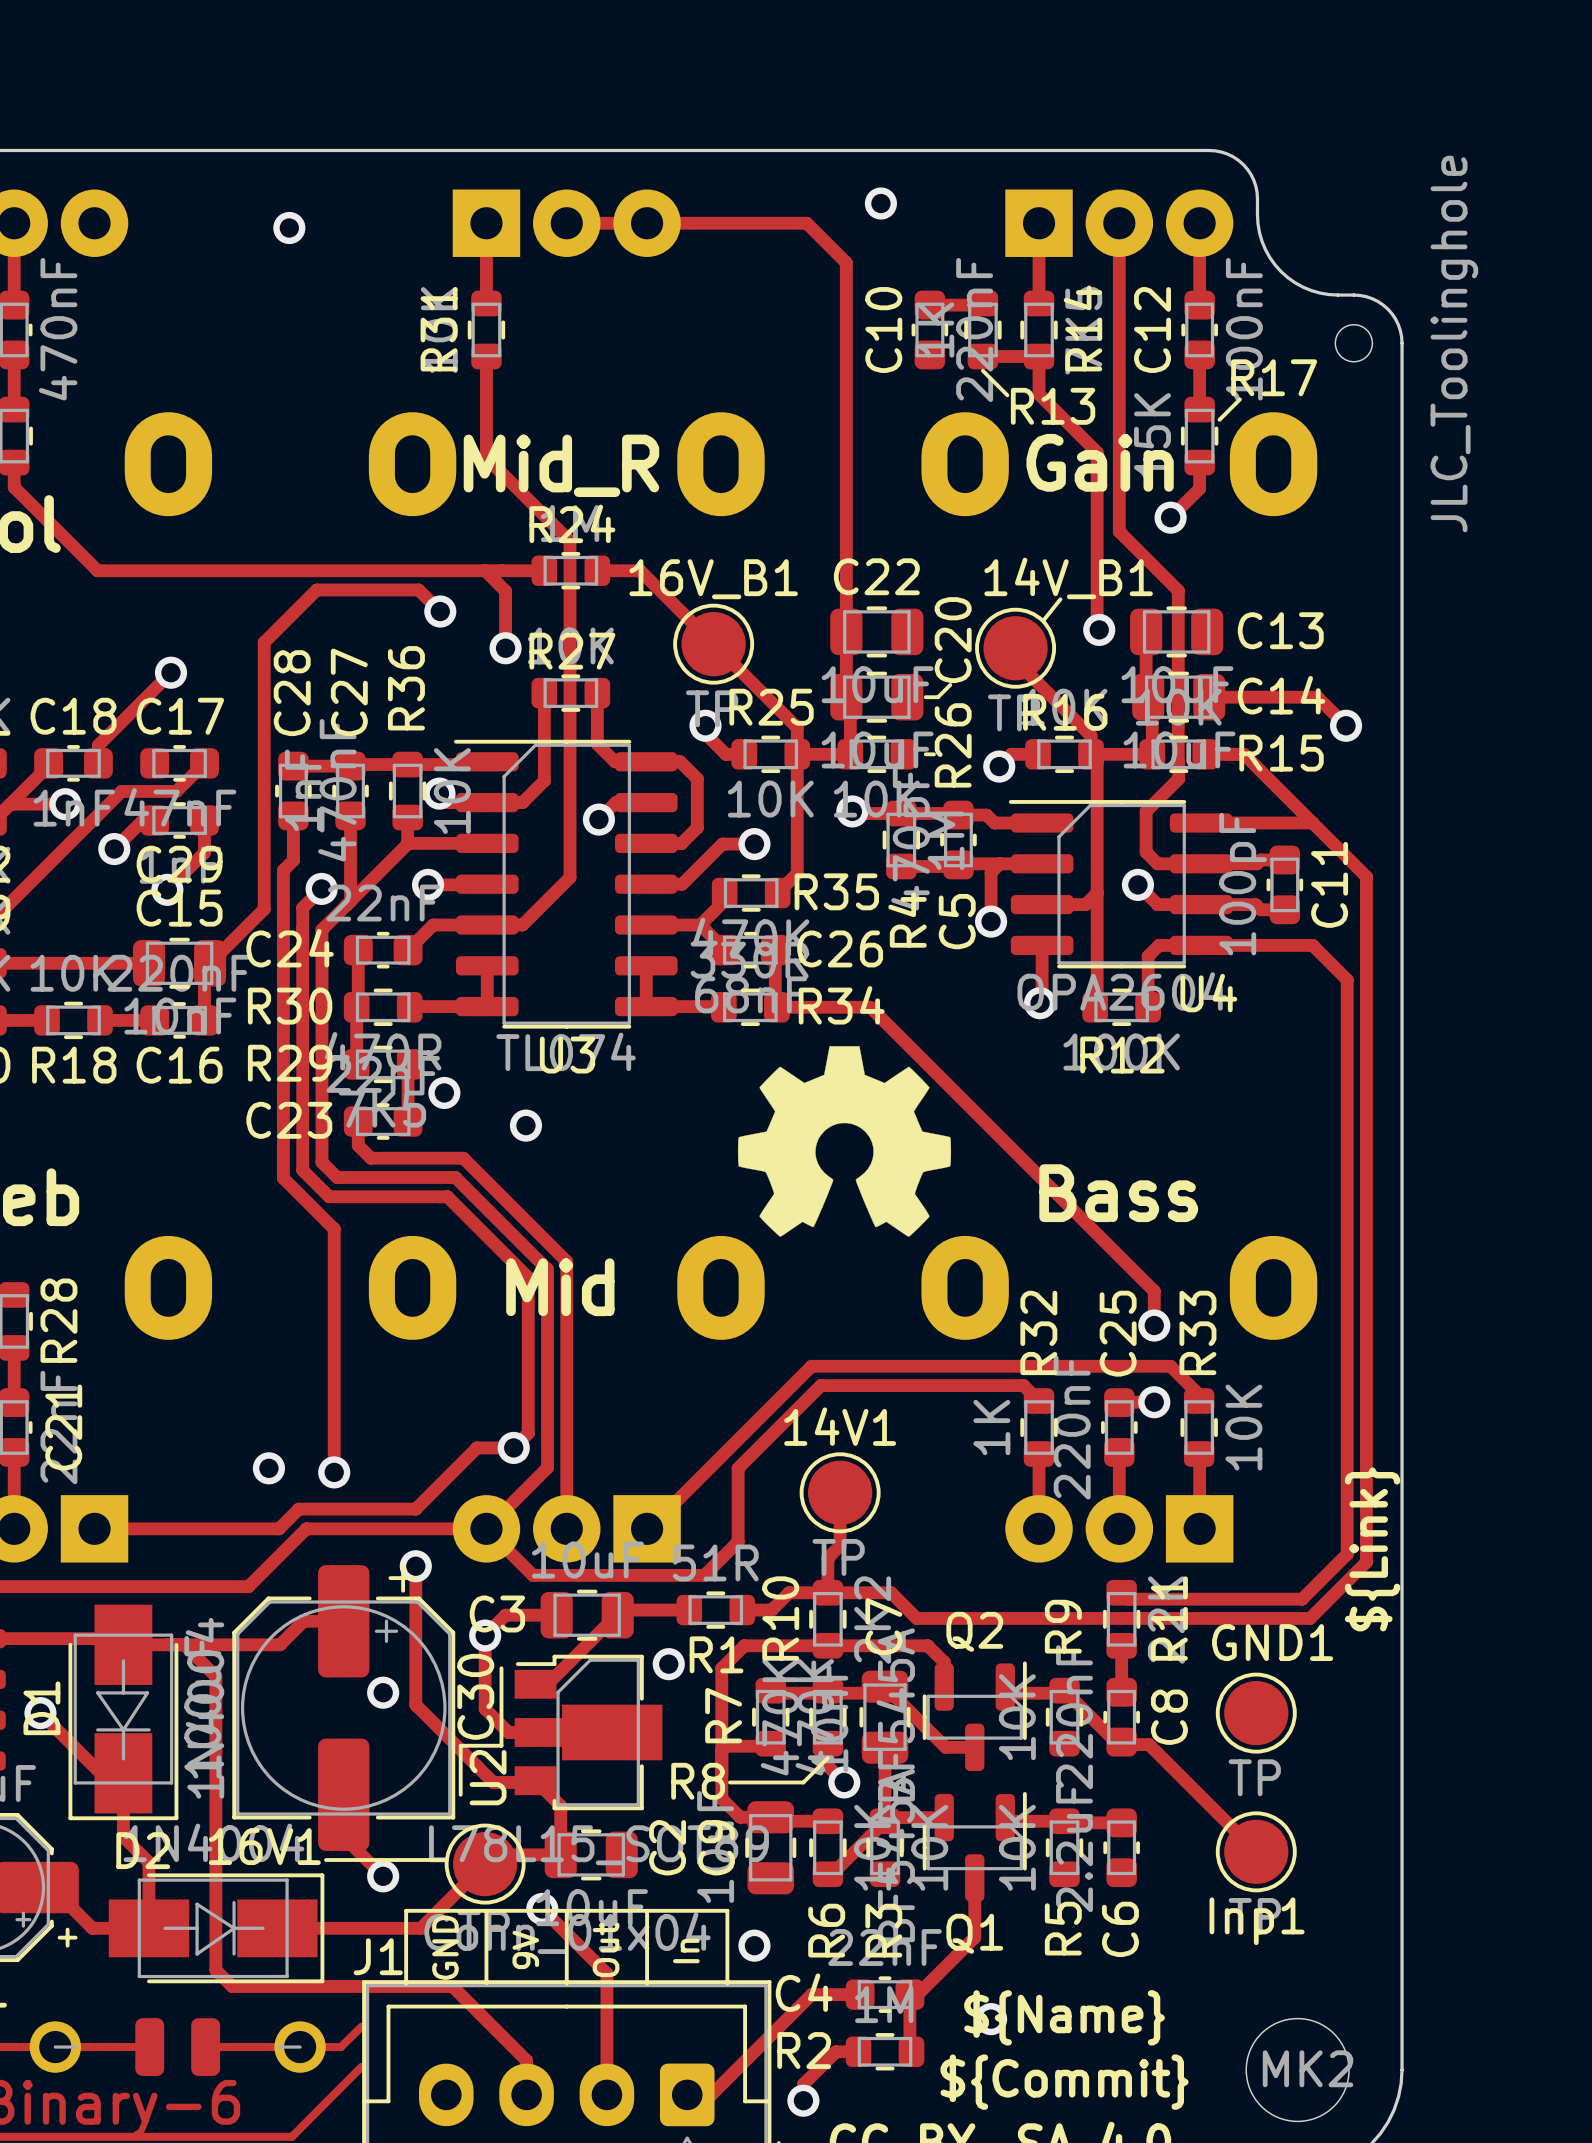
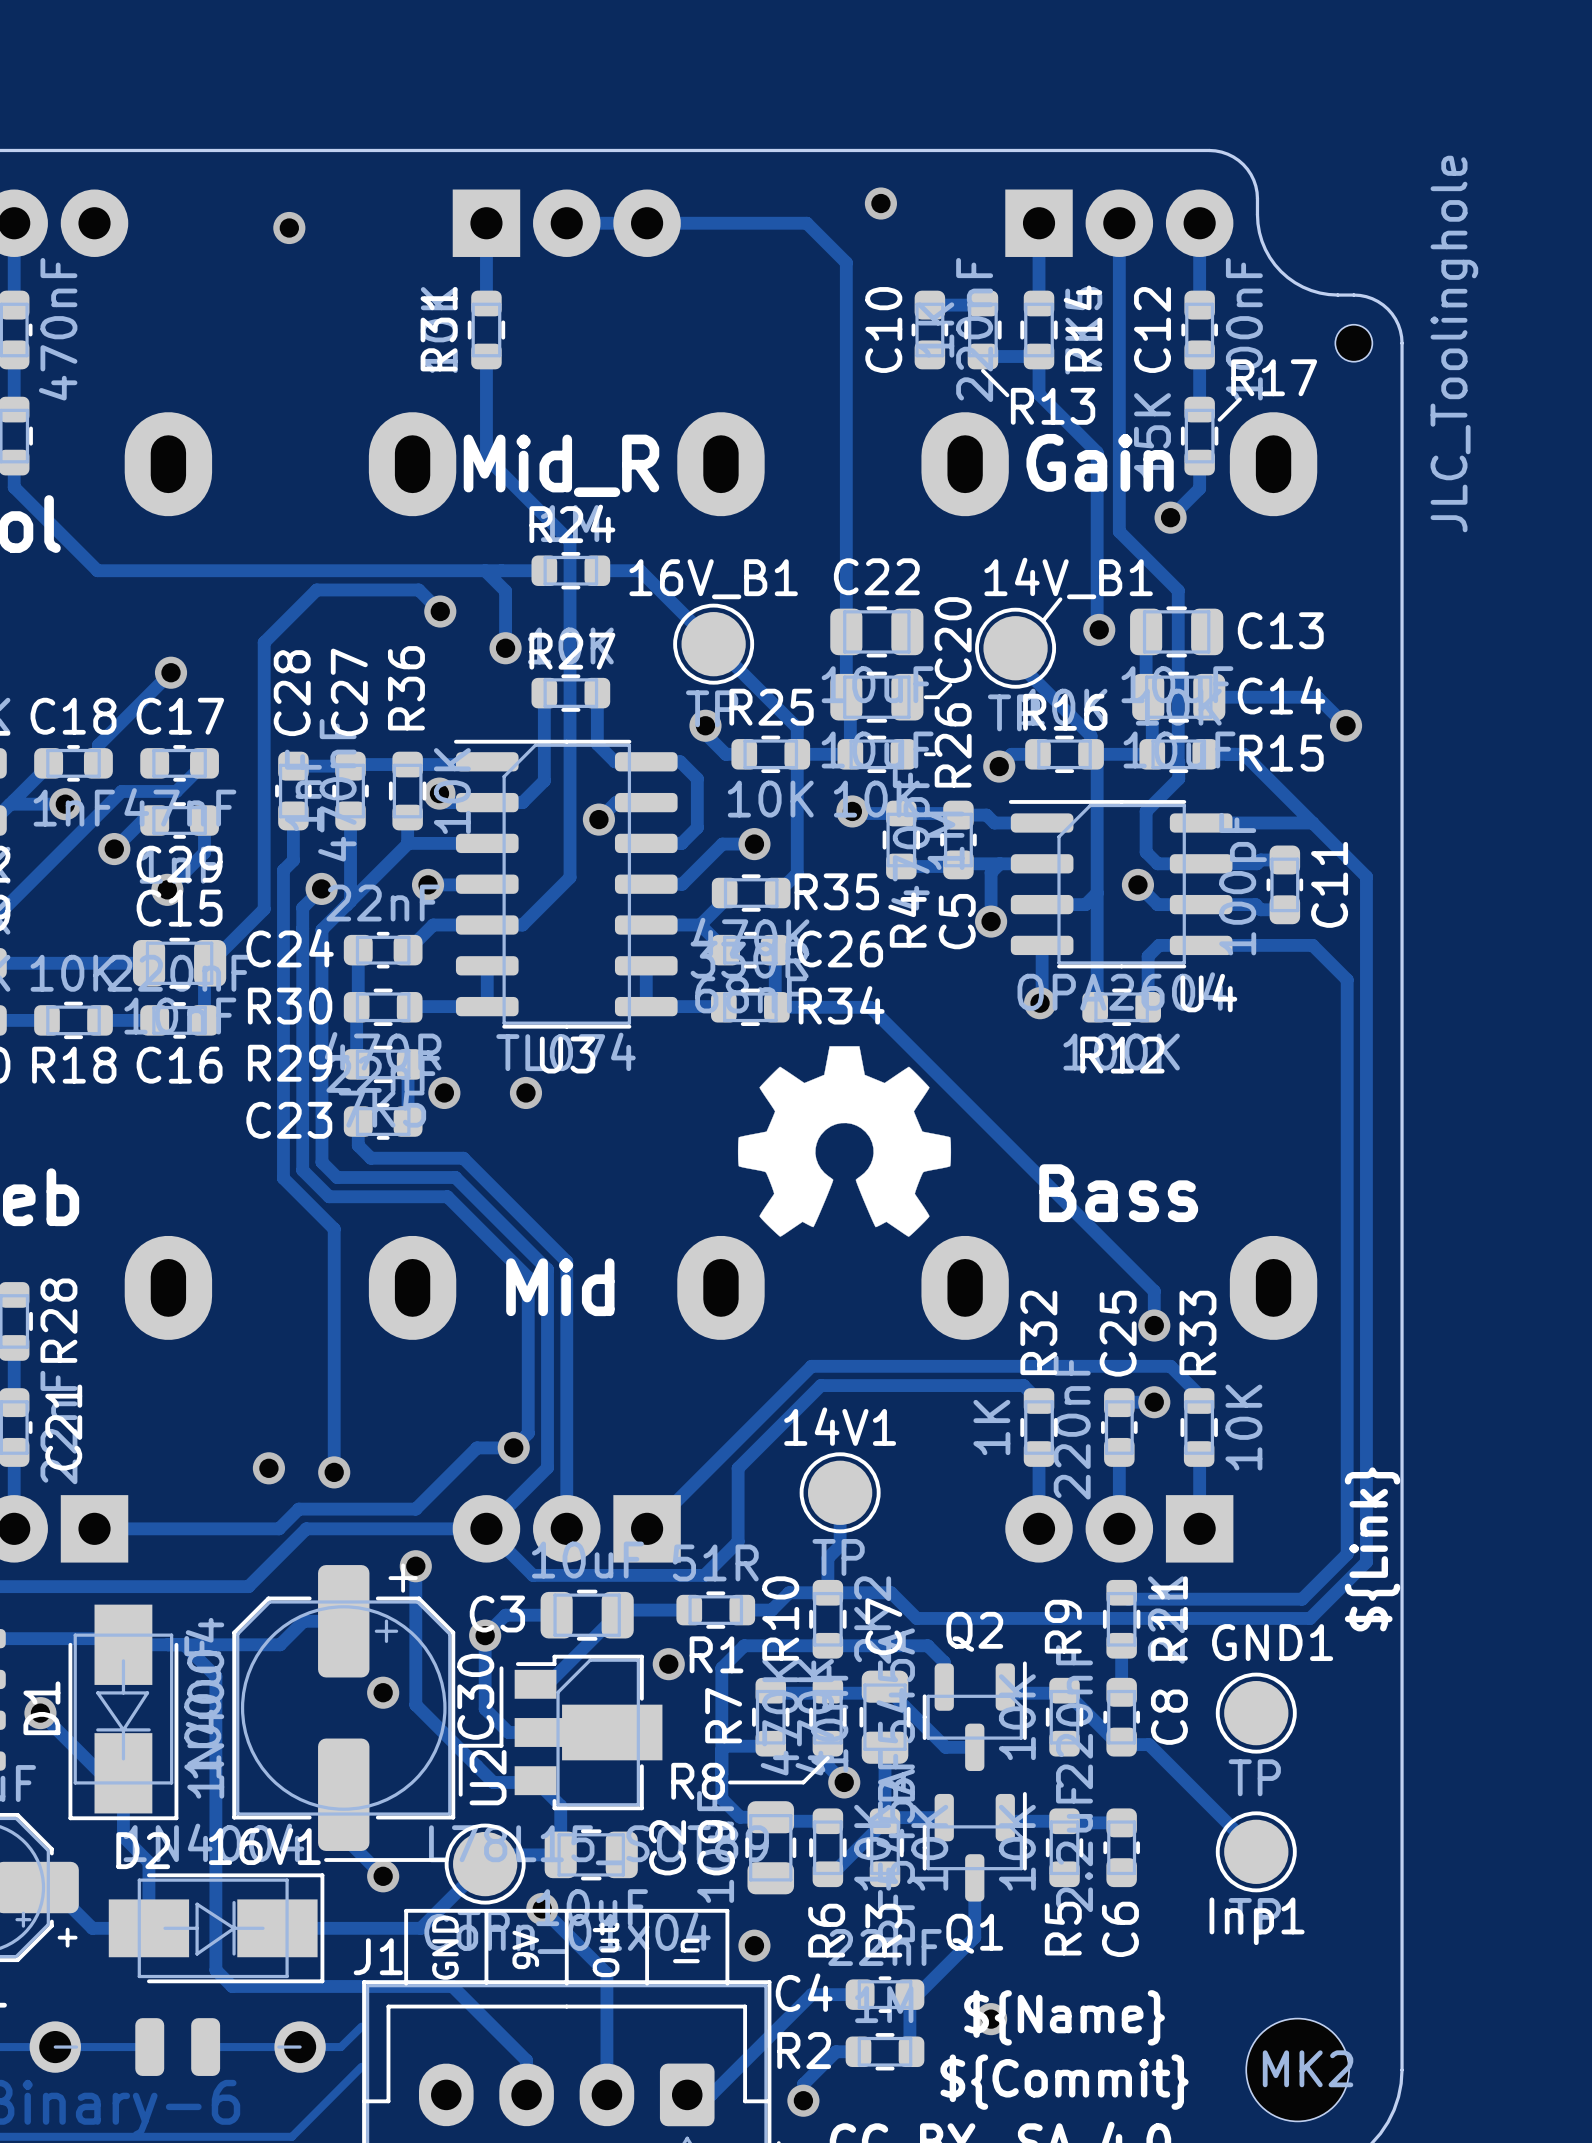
via position: (525, 1125) -> (525, 1092)

